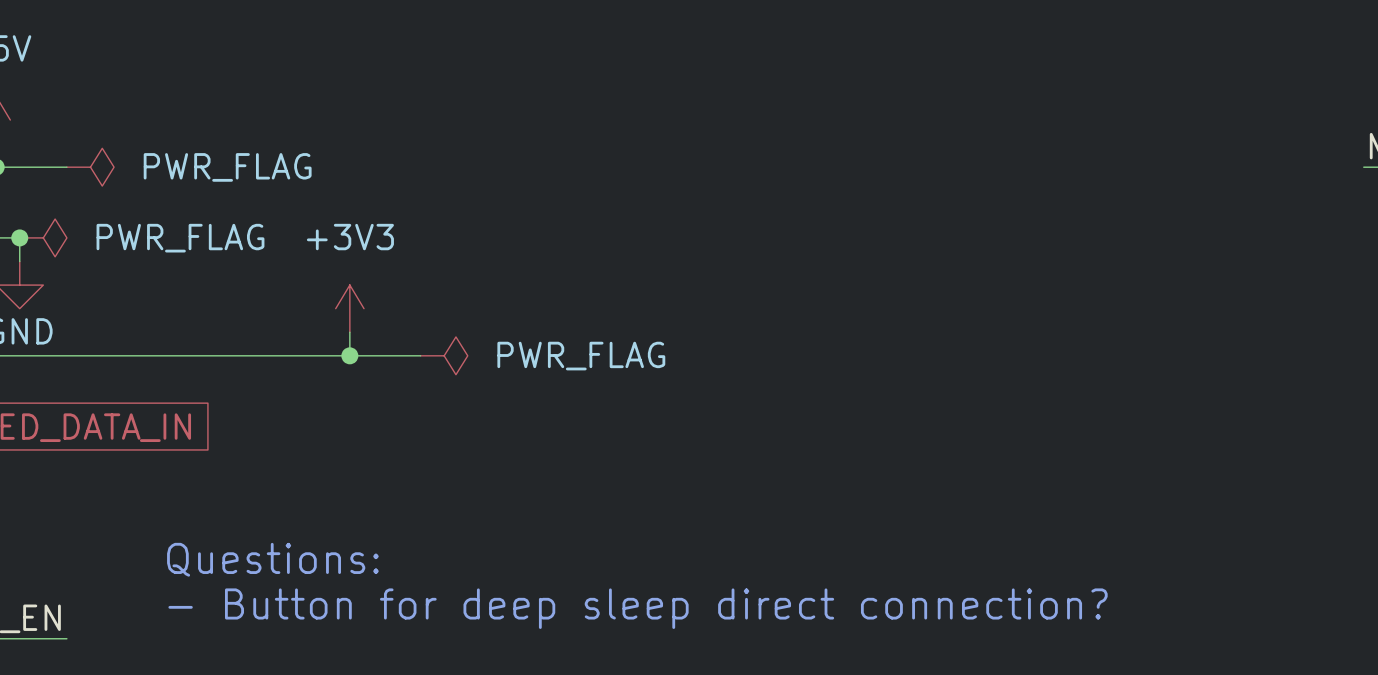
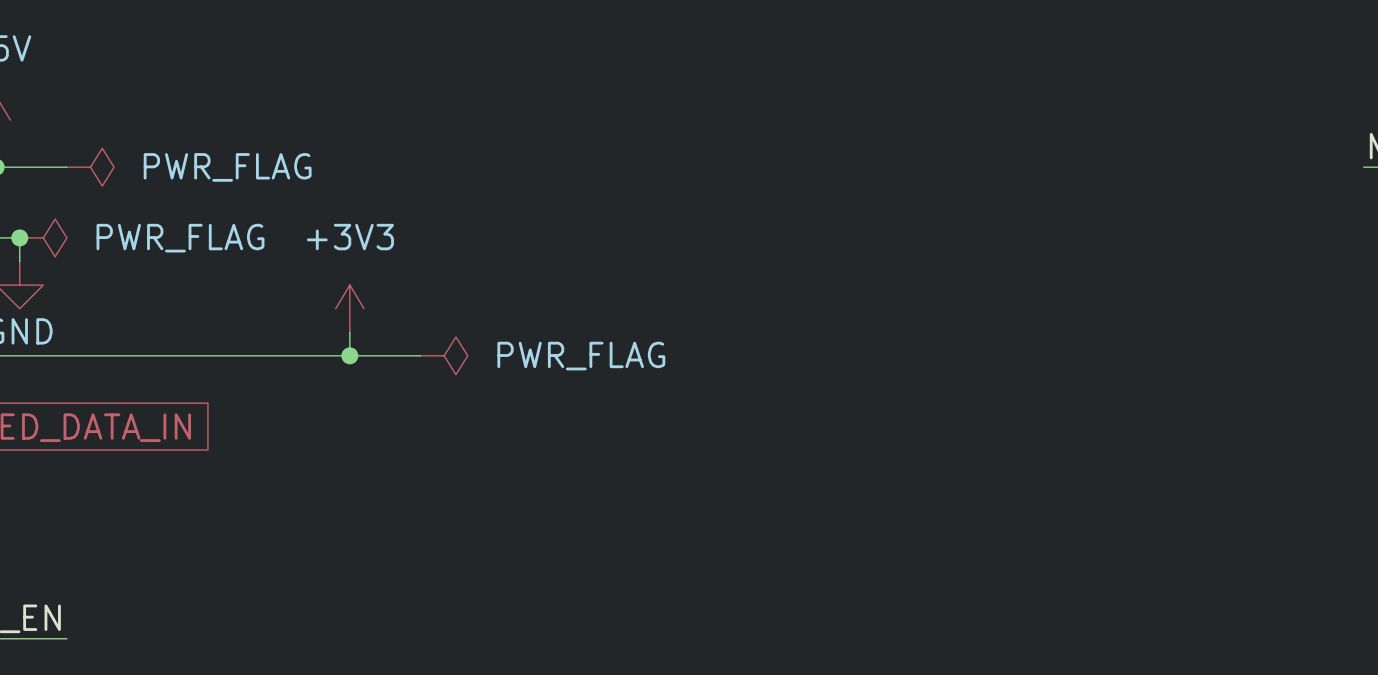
text: Questions: (272, 559) -> none
text: - Button for deep sleep direct connection? (638, 608) -> none

